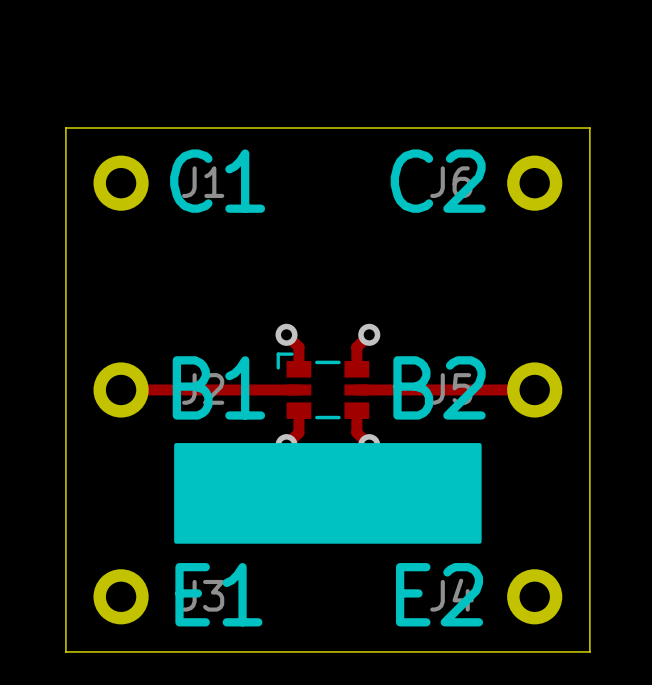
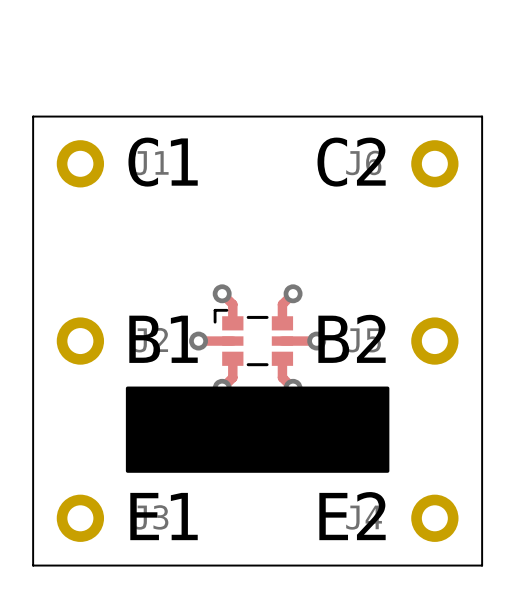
track: (121, 389) (258, 389) -> none
via: none -> (198, 341)
track: (396, 389) (534, 389) -> none
via: none -> (316, 341)

